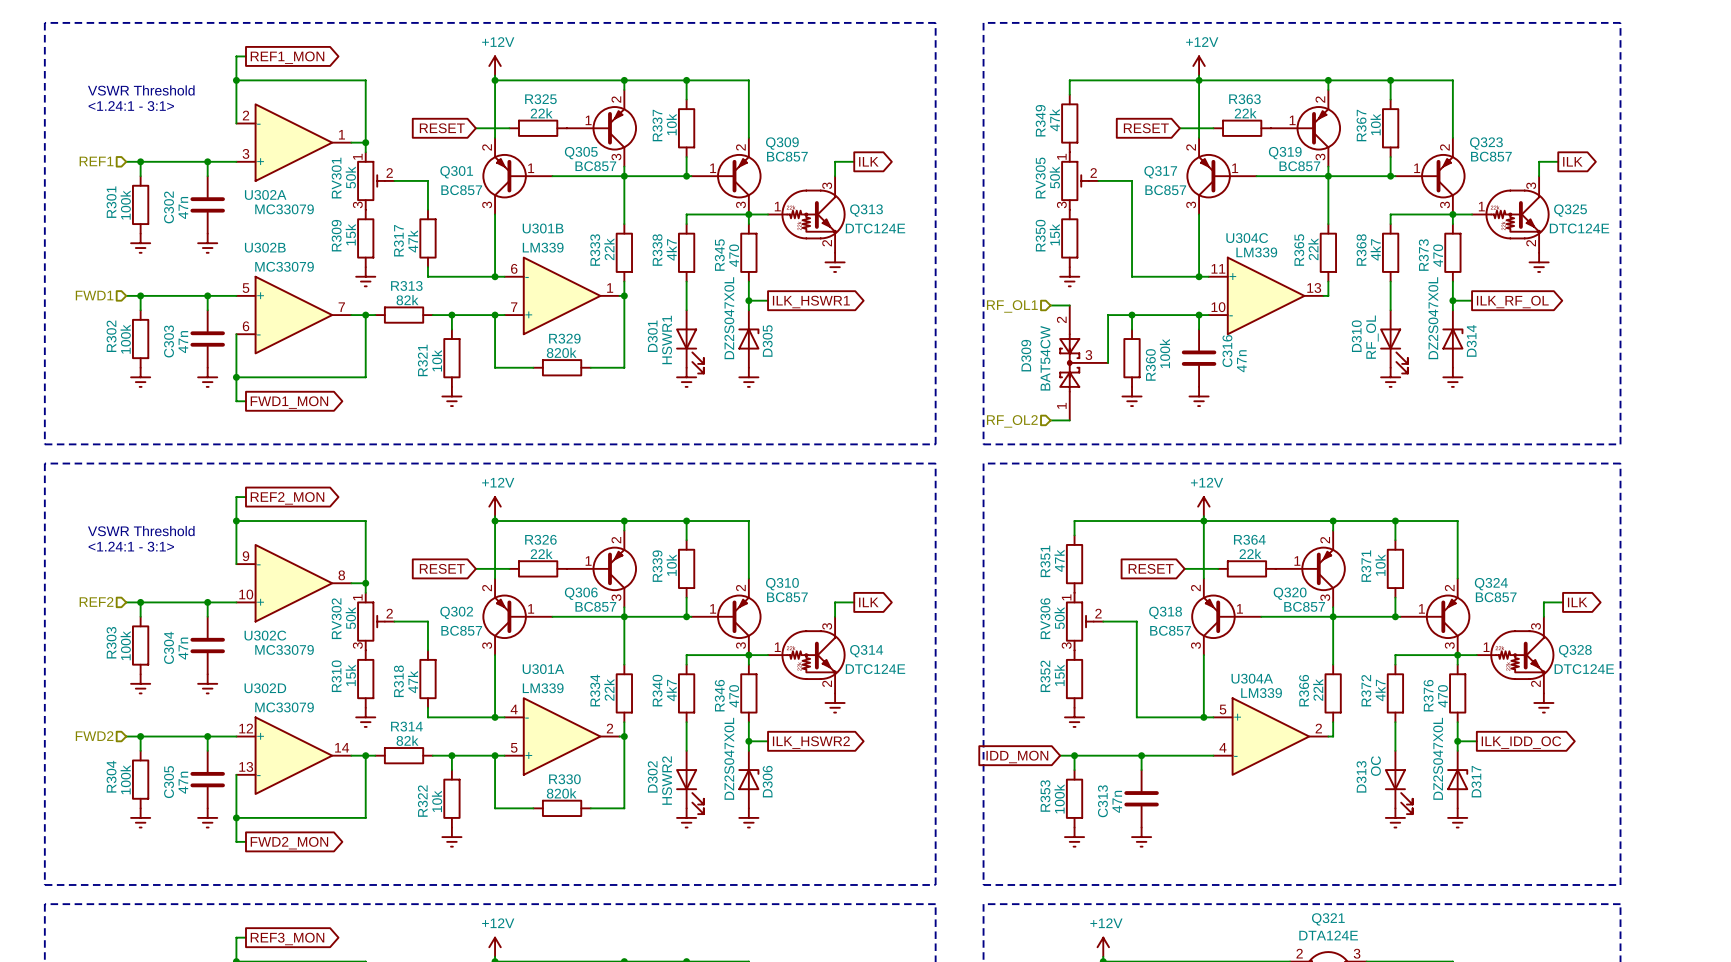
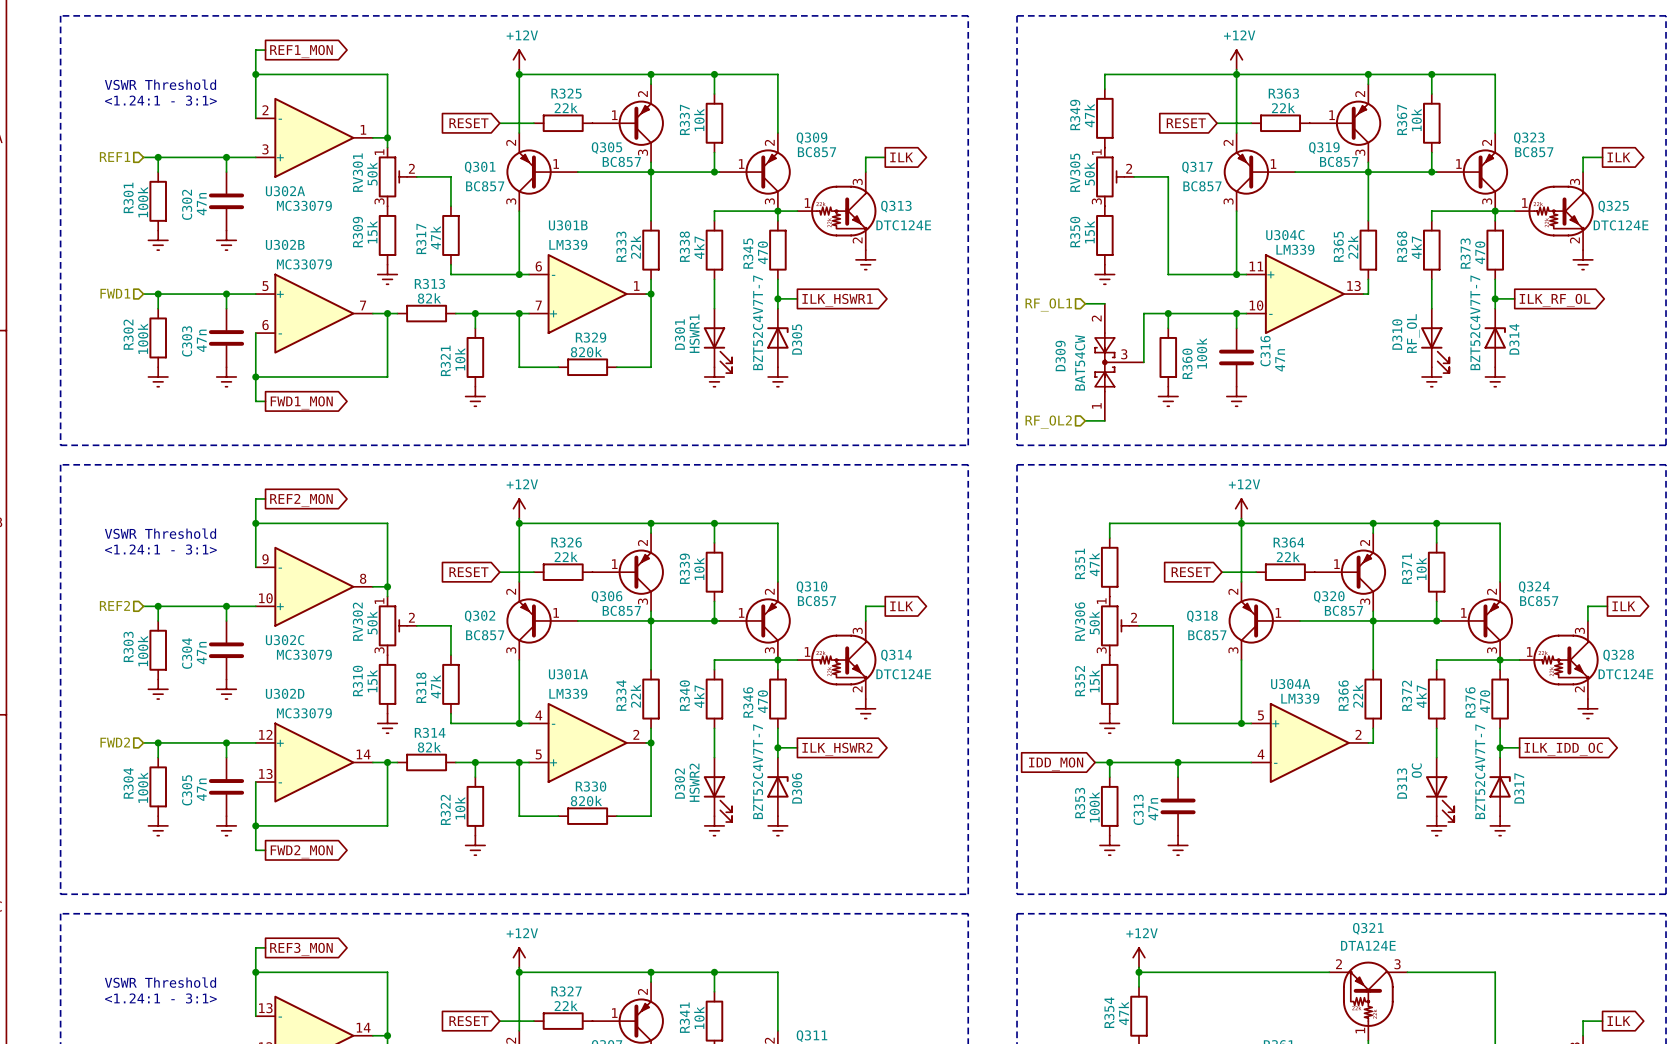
D305 value: DZ2S047X0L (729, 318) -> BZT52C4V7T-7 (758, 322)
D314 value: DZ2S047X0L (1433, 318) -> BZT52C4V7T-7 (1475, 322)
D306 value: DZ2S047X0L (729, 758) -> BZT52C4V7T-7 (758, 771)
D317 value: DZ2S047X0L (1438, 758) -> BZT52C4V7T-7 (1480, 771)

